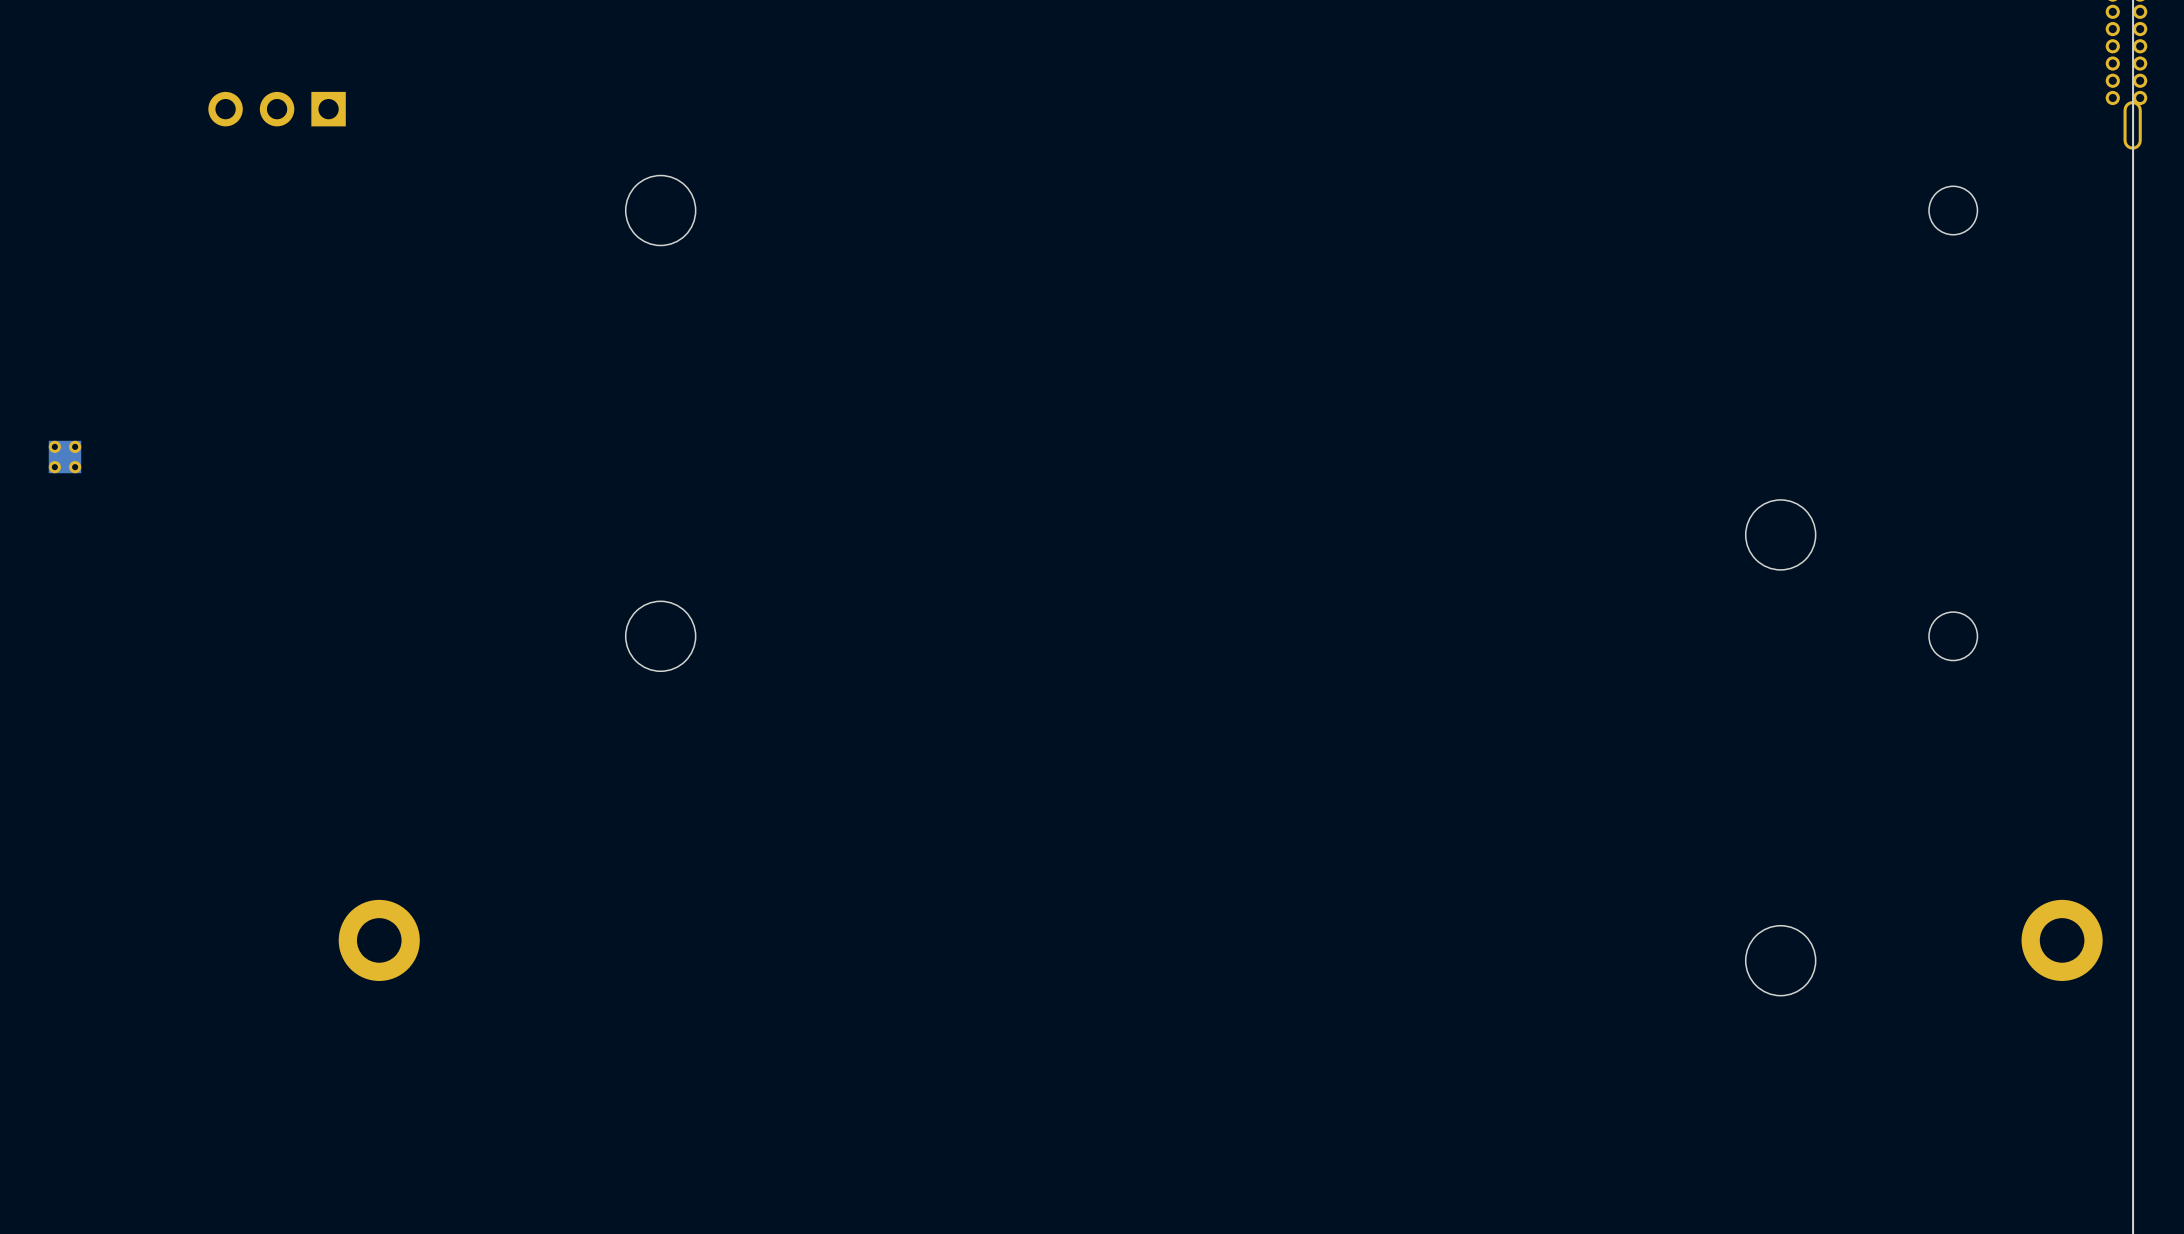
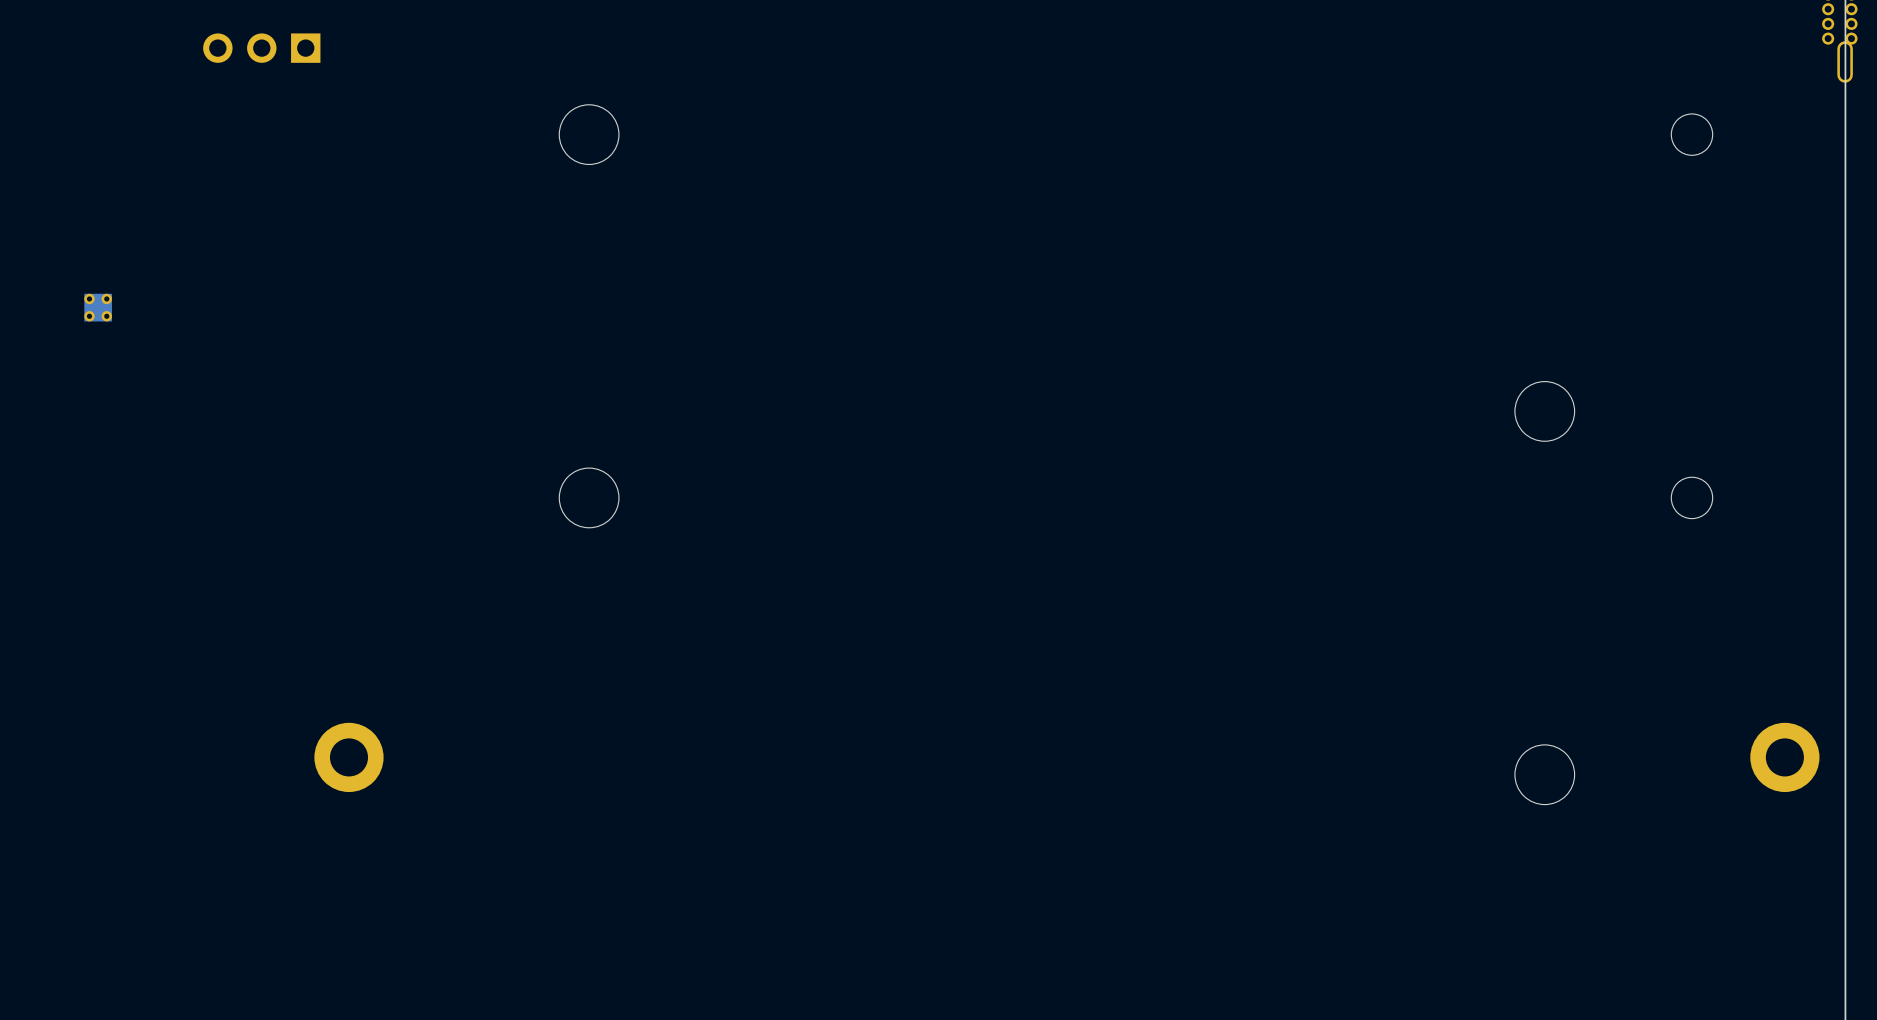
part position: (64, 457) -> (98, 307)

